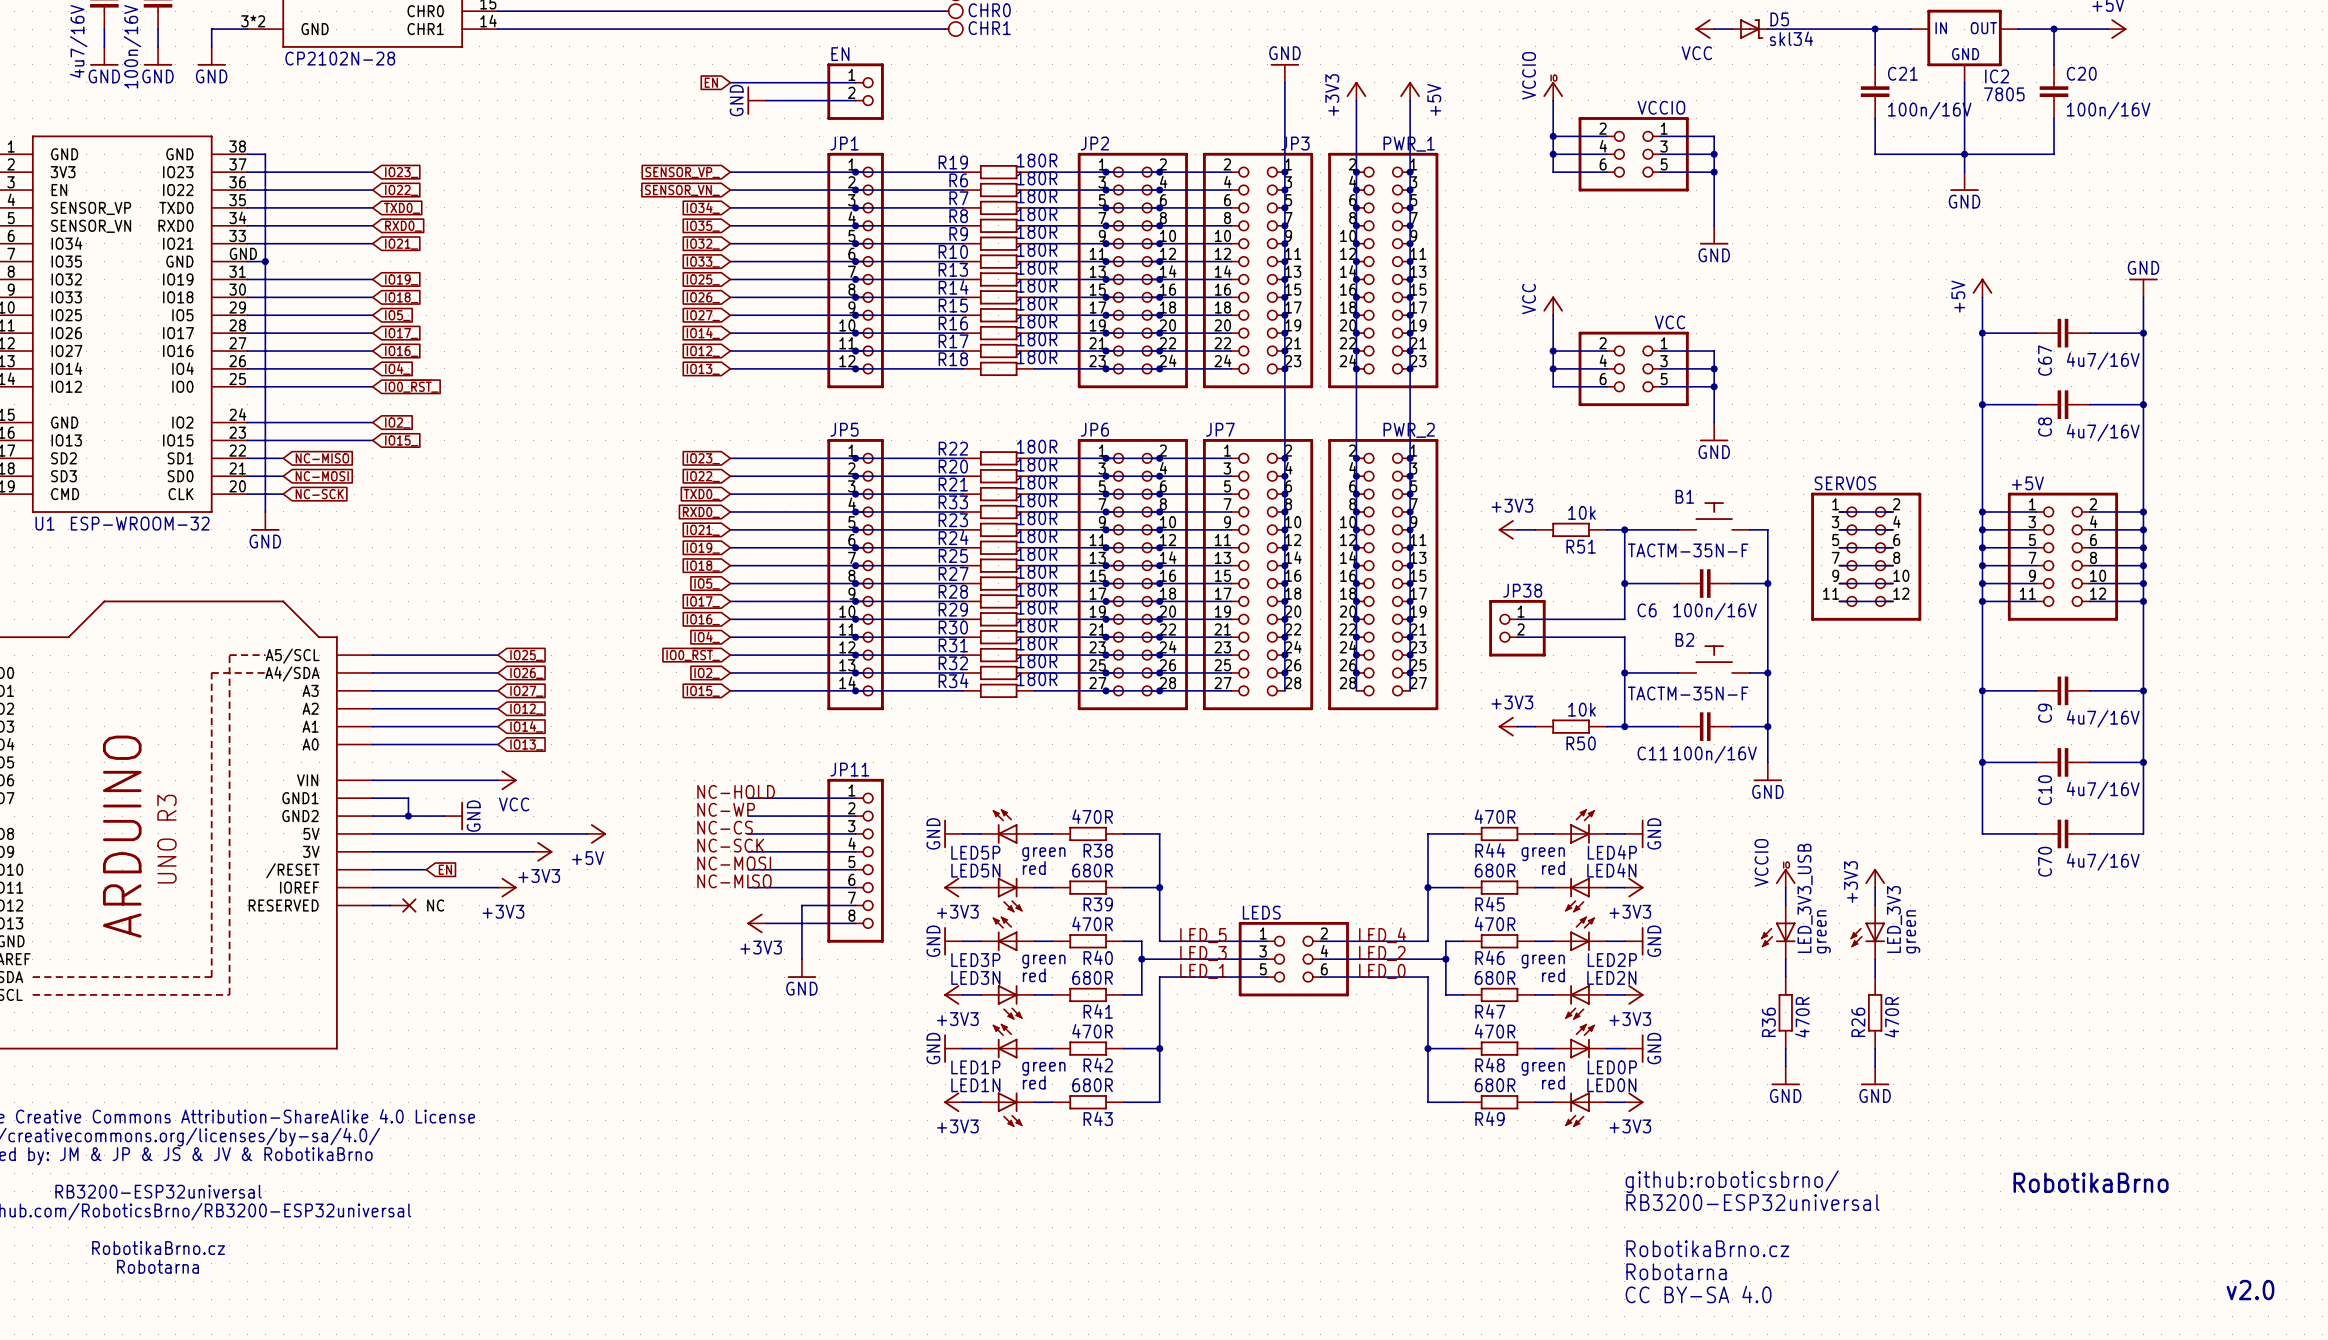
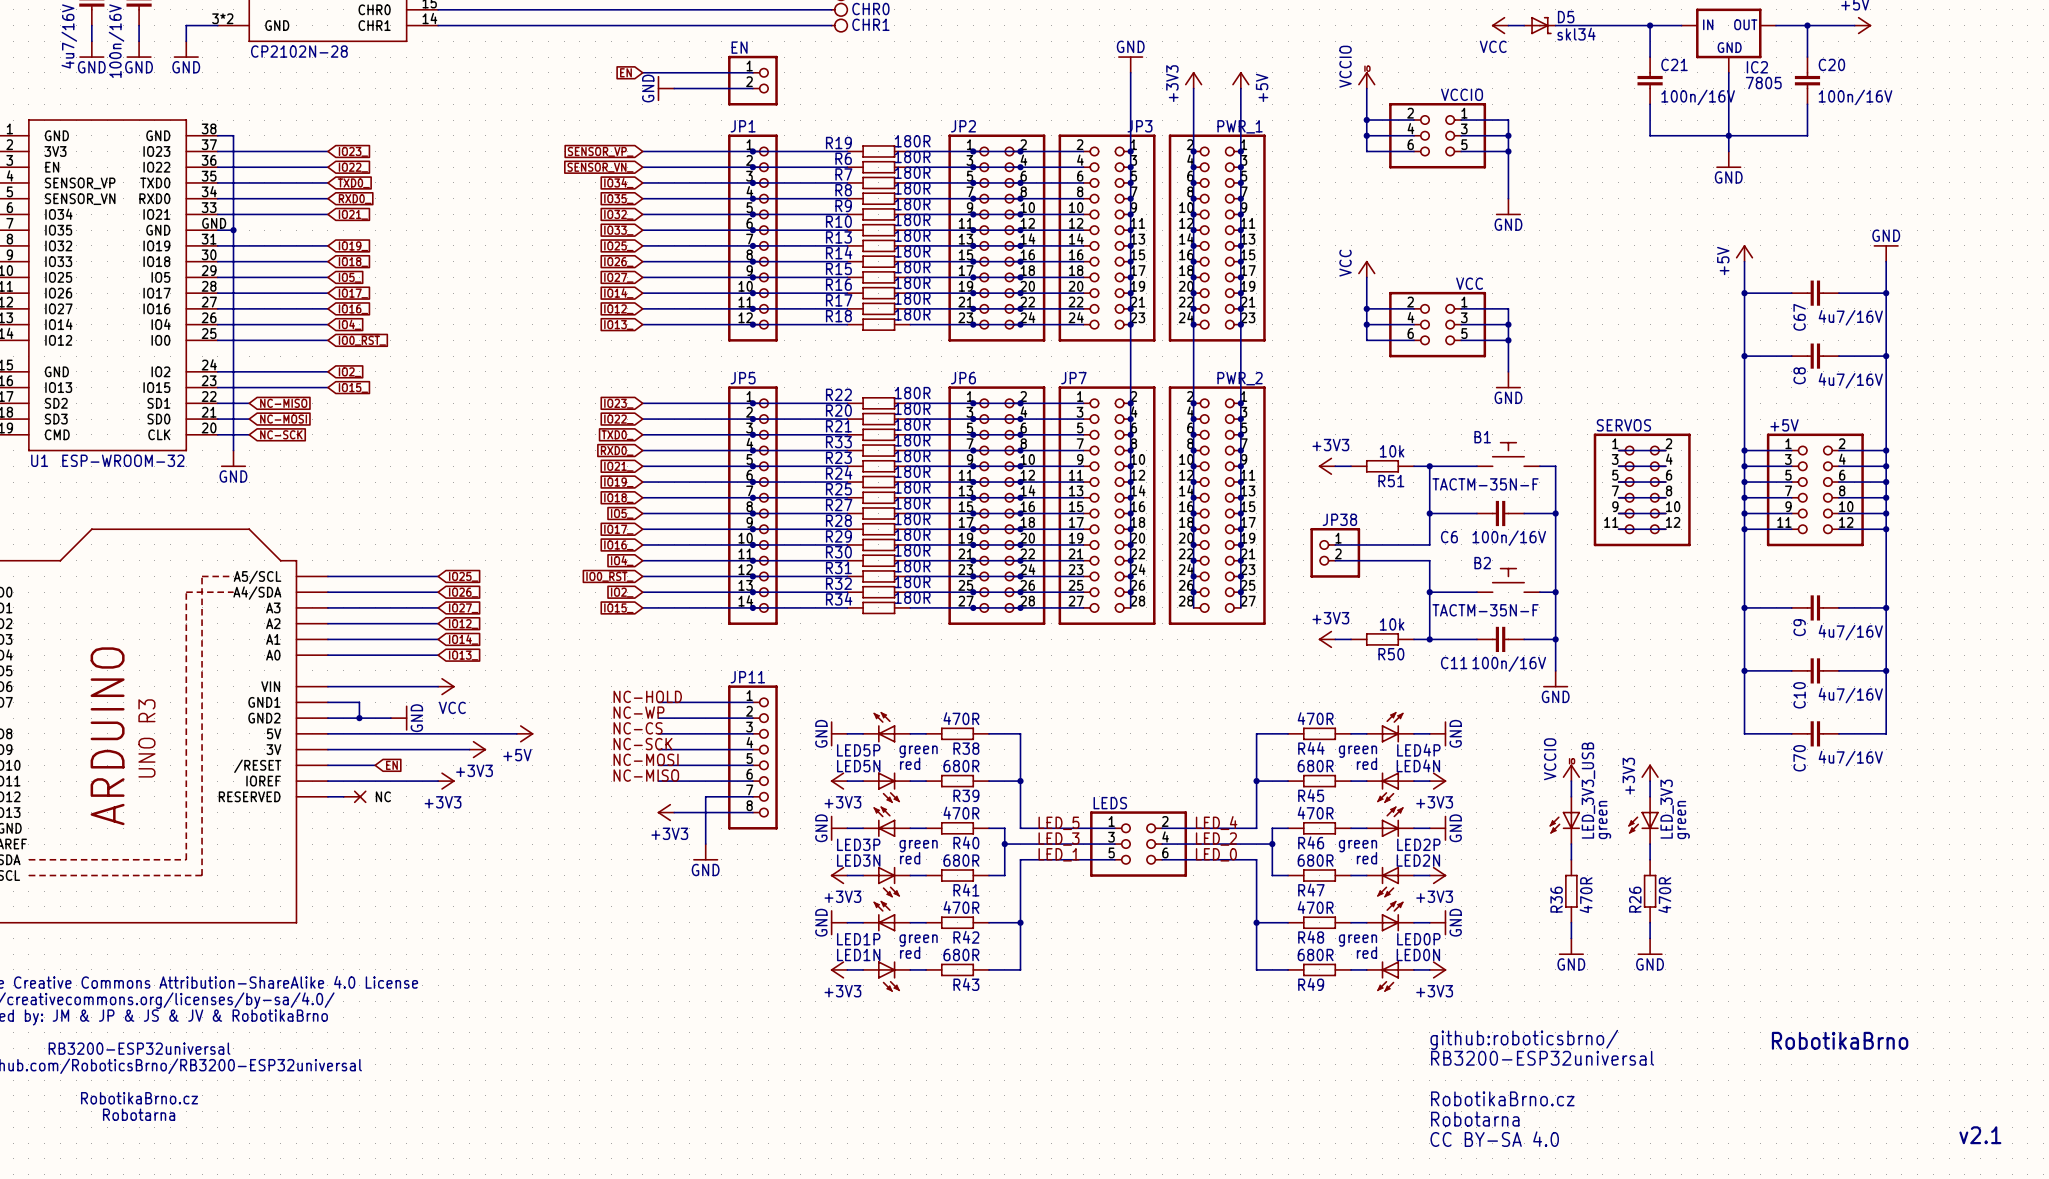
text: v2.0 (2250, 1290) -> v2.1 (1980, 1135)

